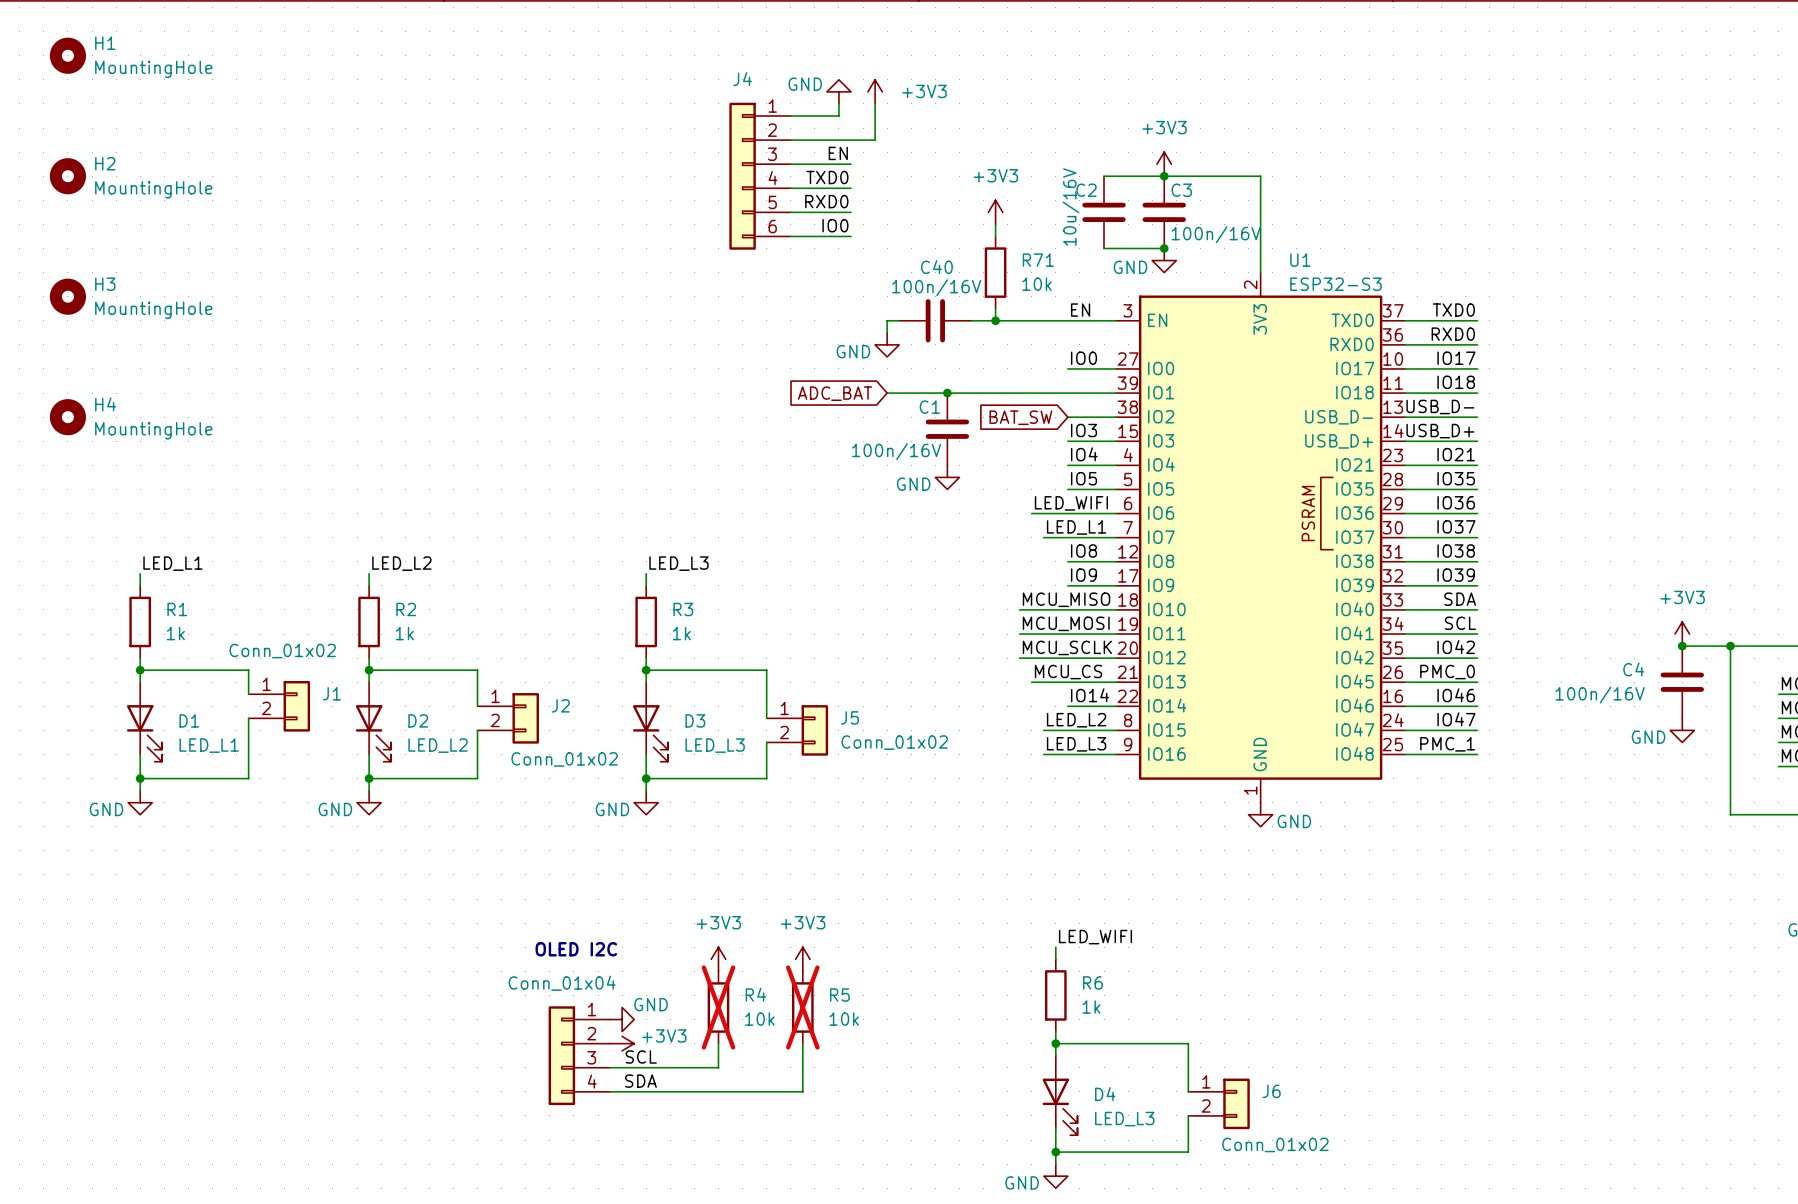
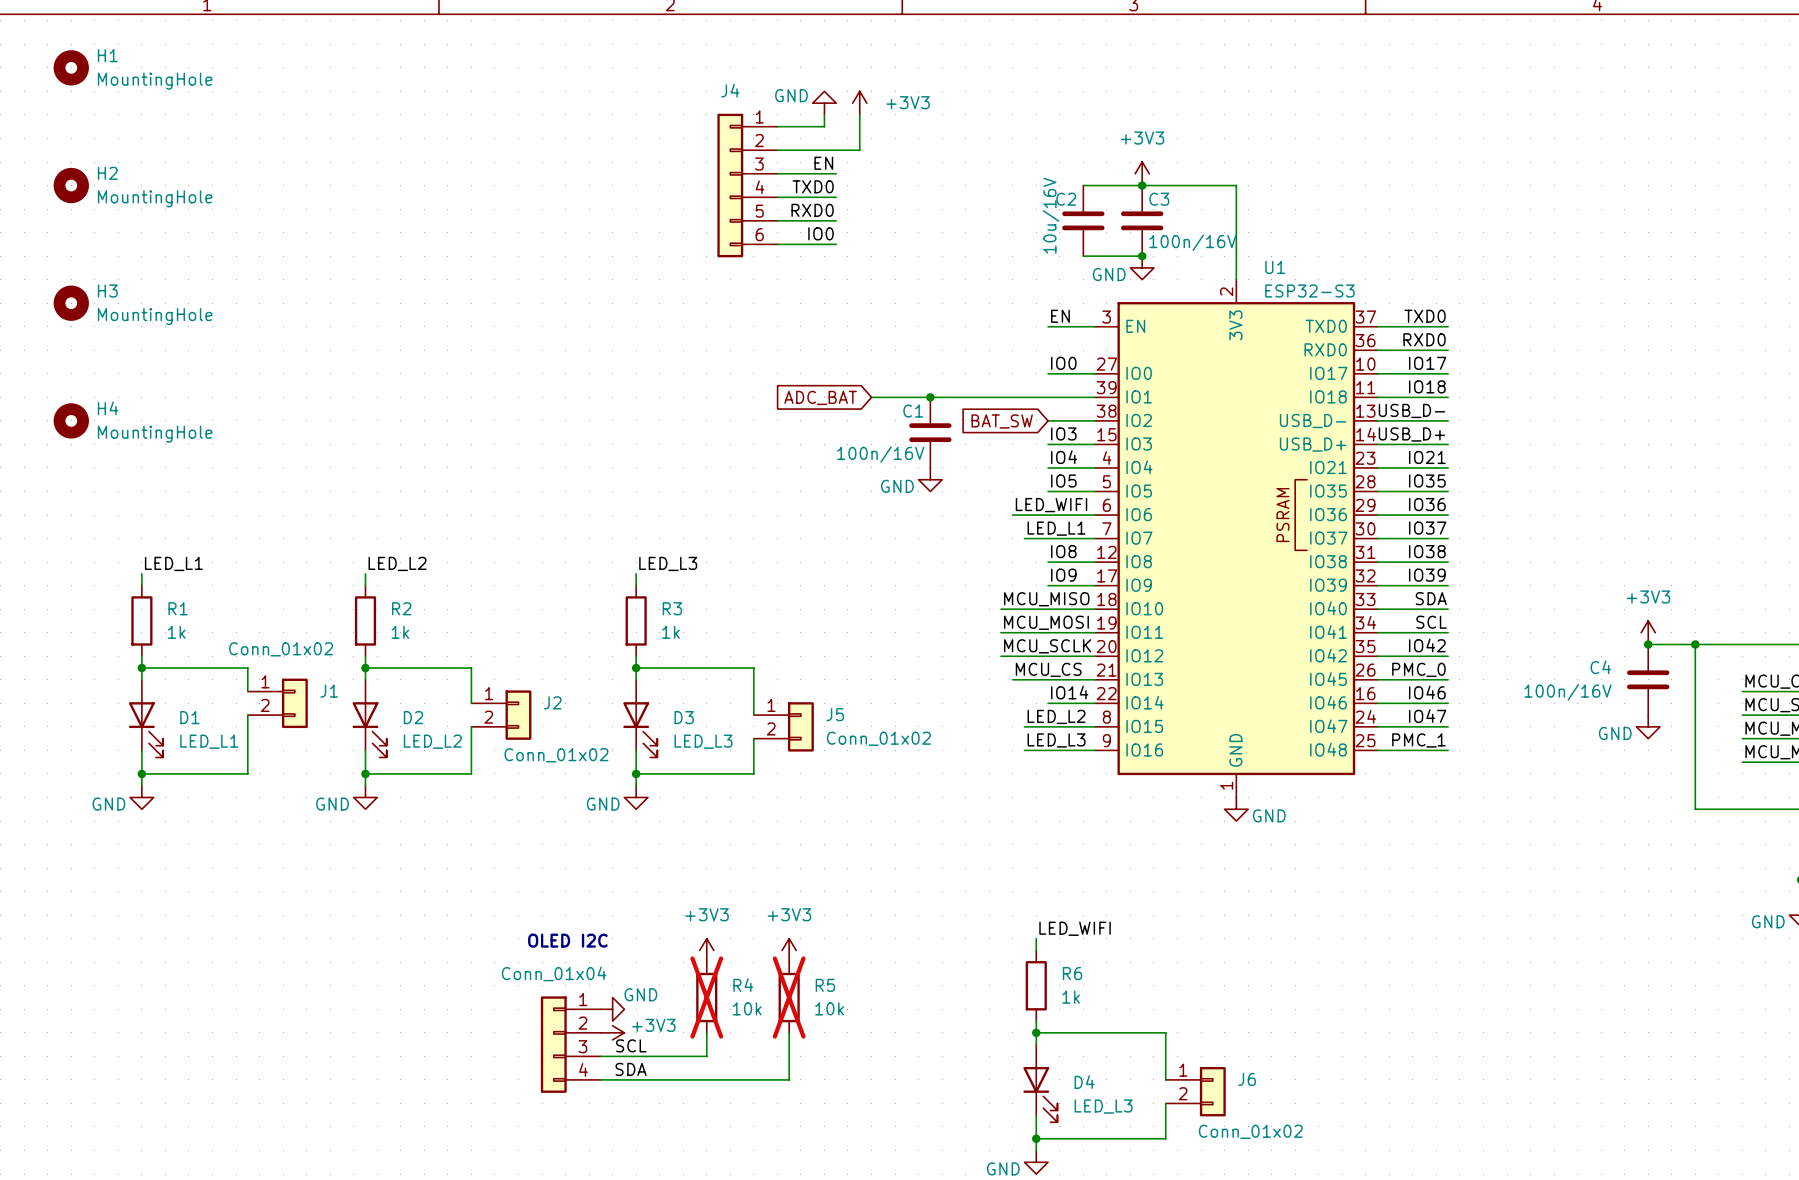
power symbol: +3V3 (995, 212) -> none
wire: (995, 224) (995, 236) -> none
R71: 10k (995, 272) -> none
wire: (995, 308) (995, 320) -> none
wire: (899, 320) (887, 320) (887, 332) -> none
C40: 100n/16V (935, 320) -> none
wire: (971, 320) (1067, 320) -> none
junction: (995, 320) -> none
power symbol: GND (887, 344) -> none

